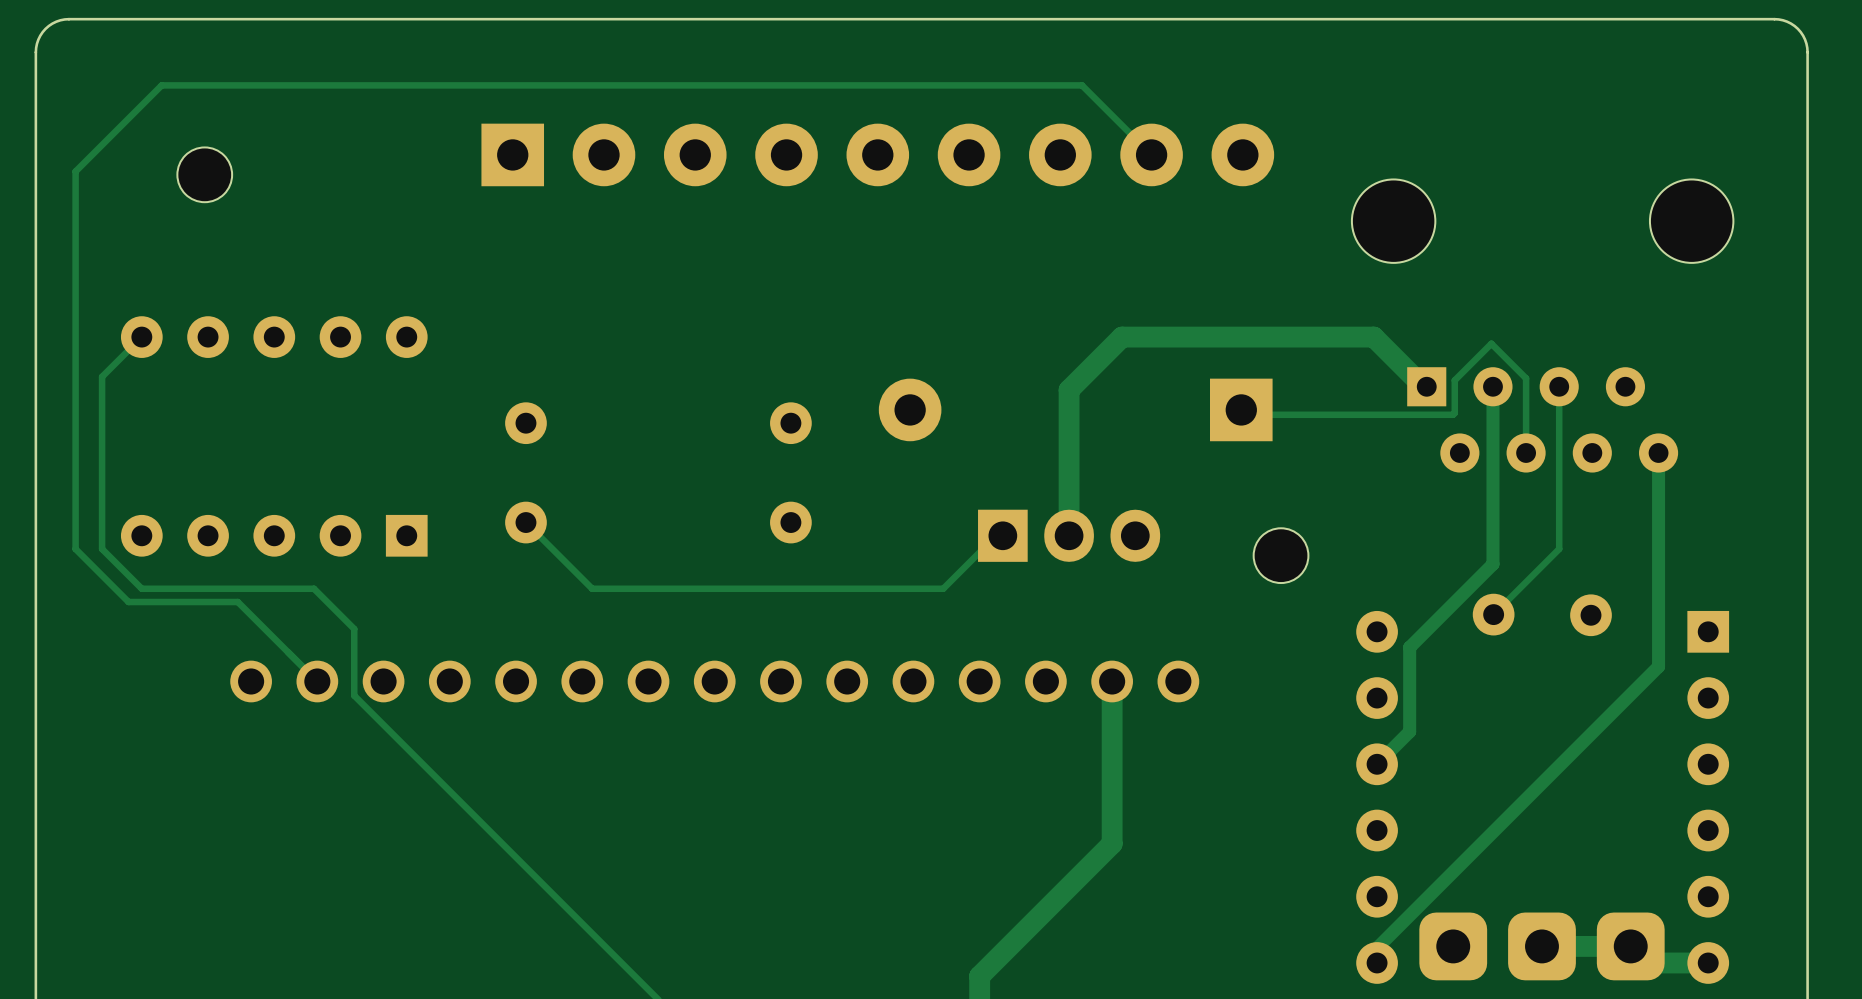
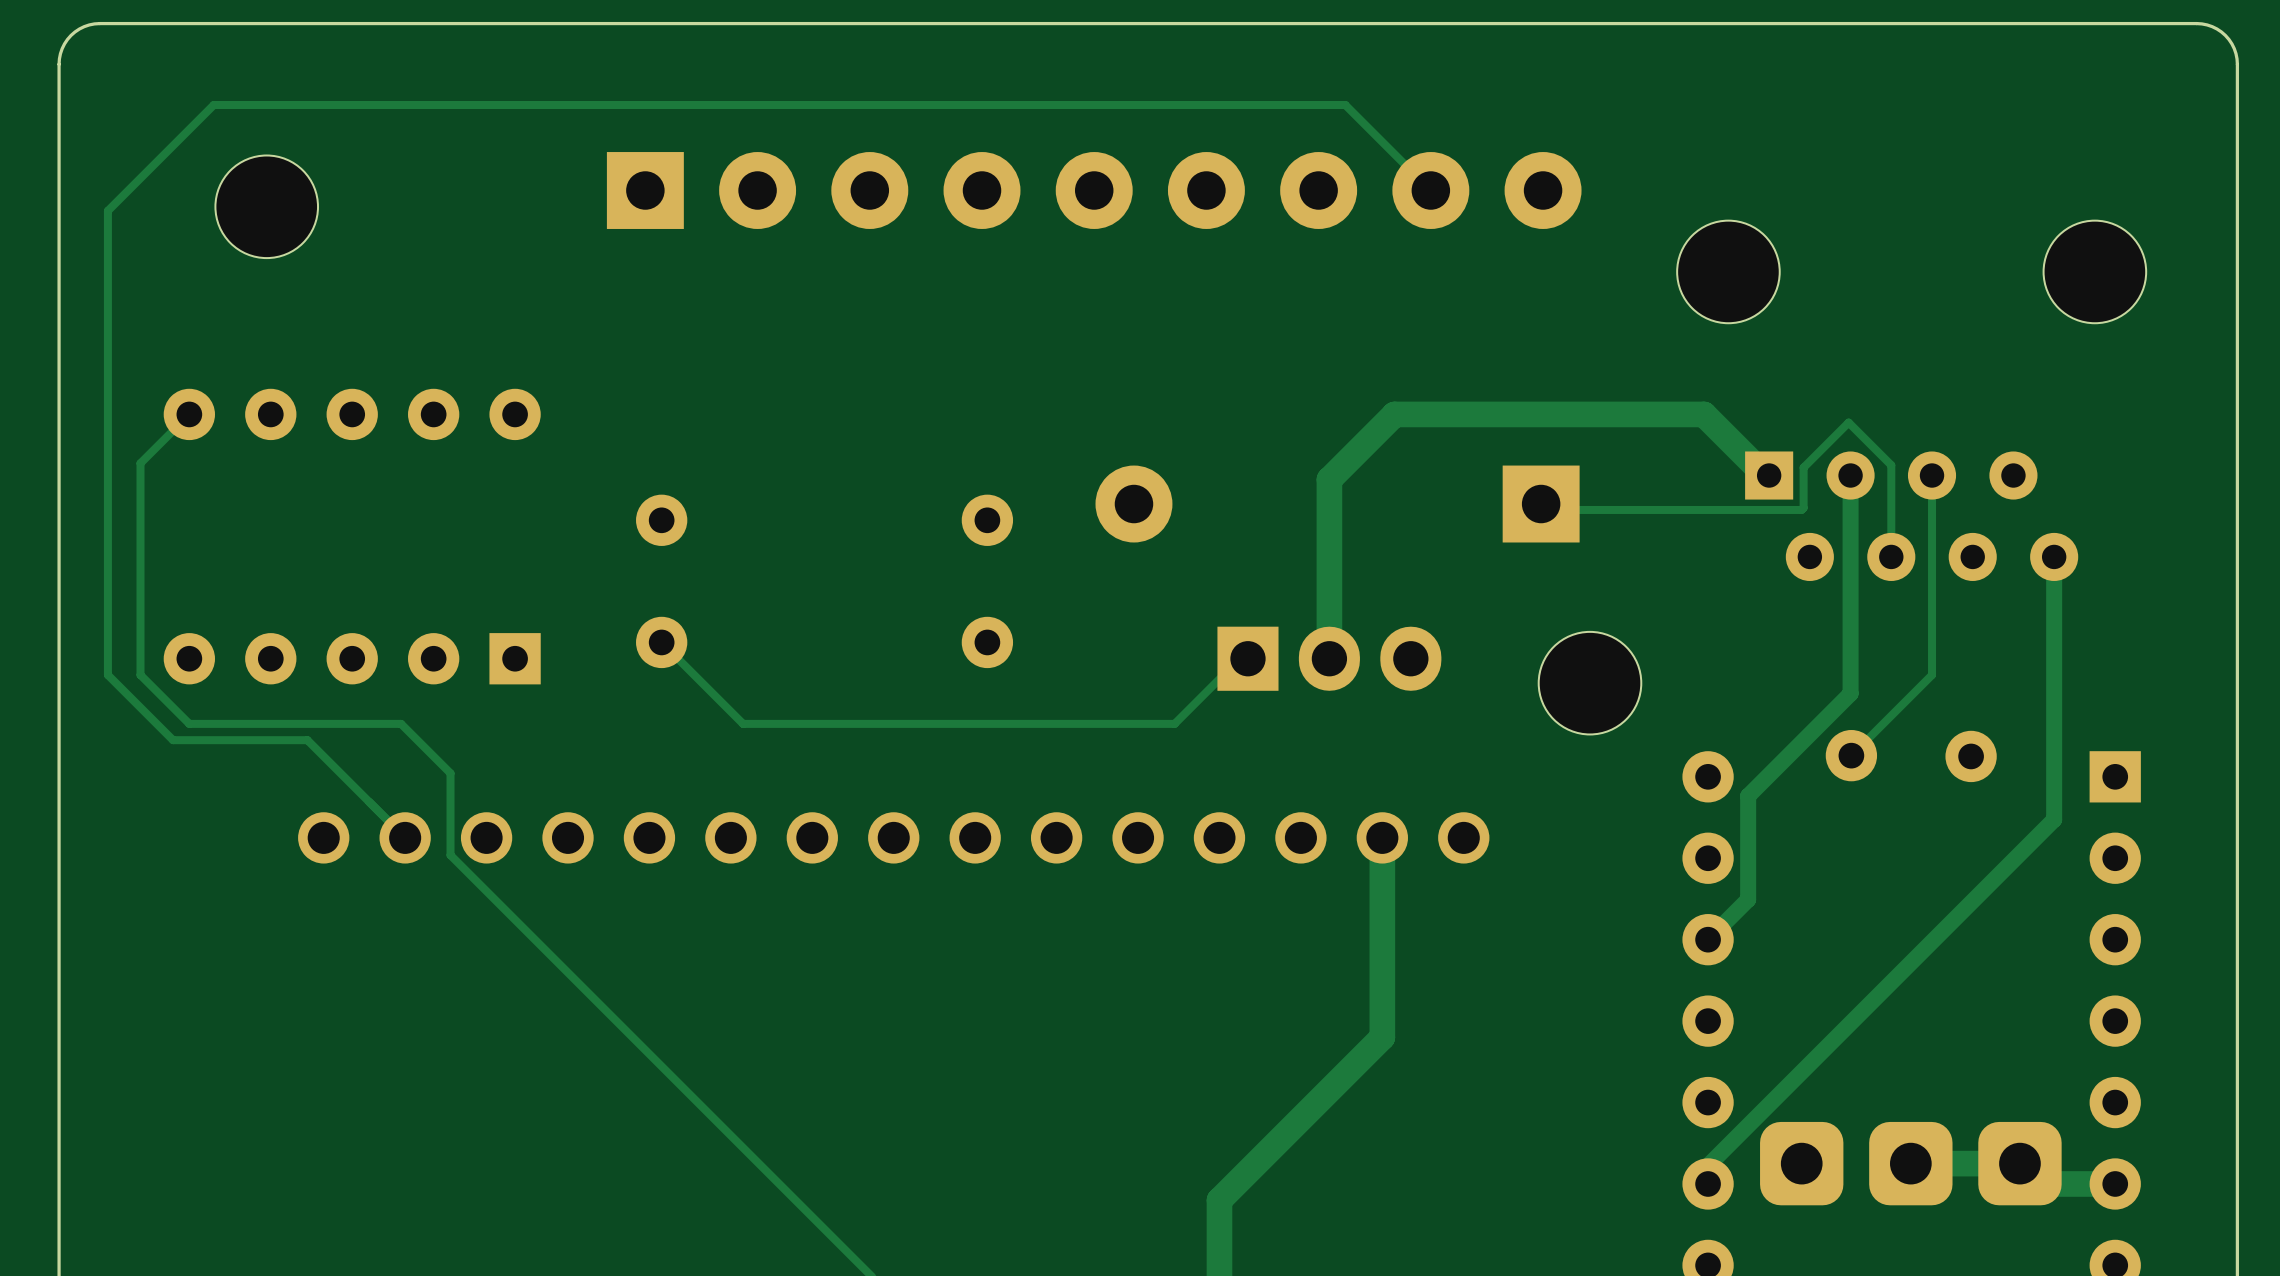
part footprint: [177, 147, 233, 203] -> [215, 155, 319, 259]
part footprint: [1253, 528, 1309, 584] -> [1538, 631, 1642, 735]

